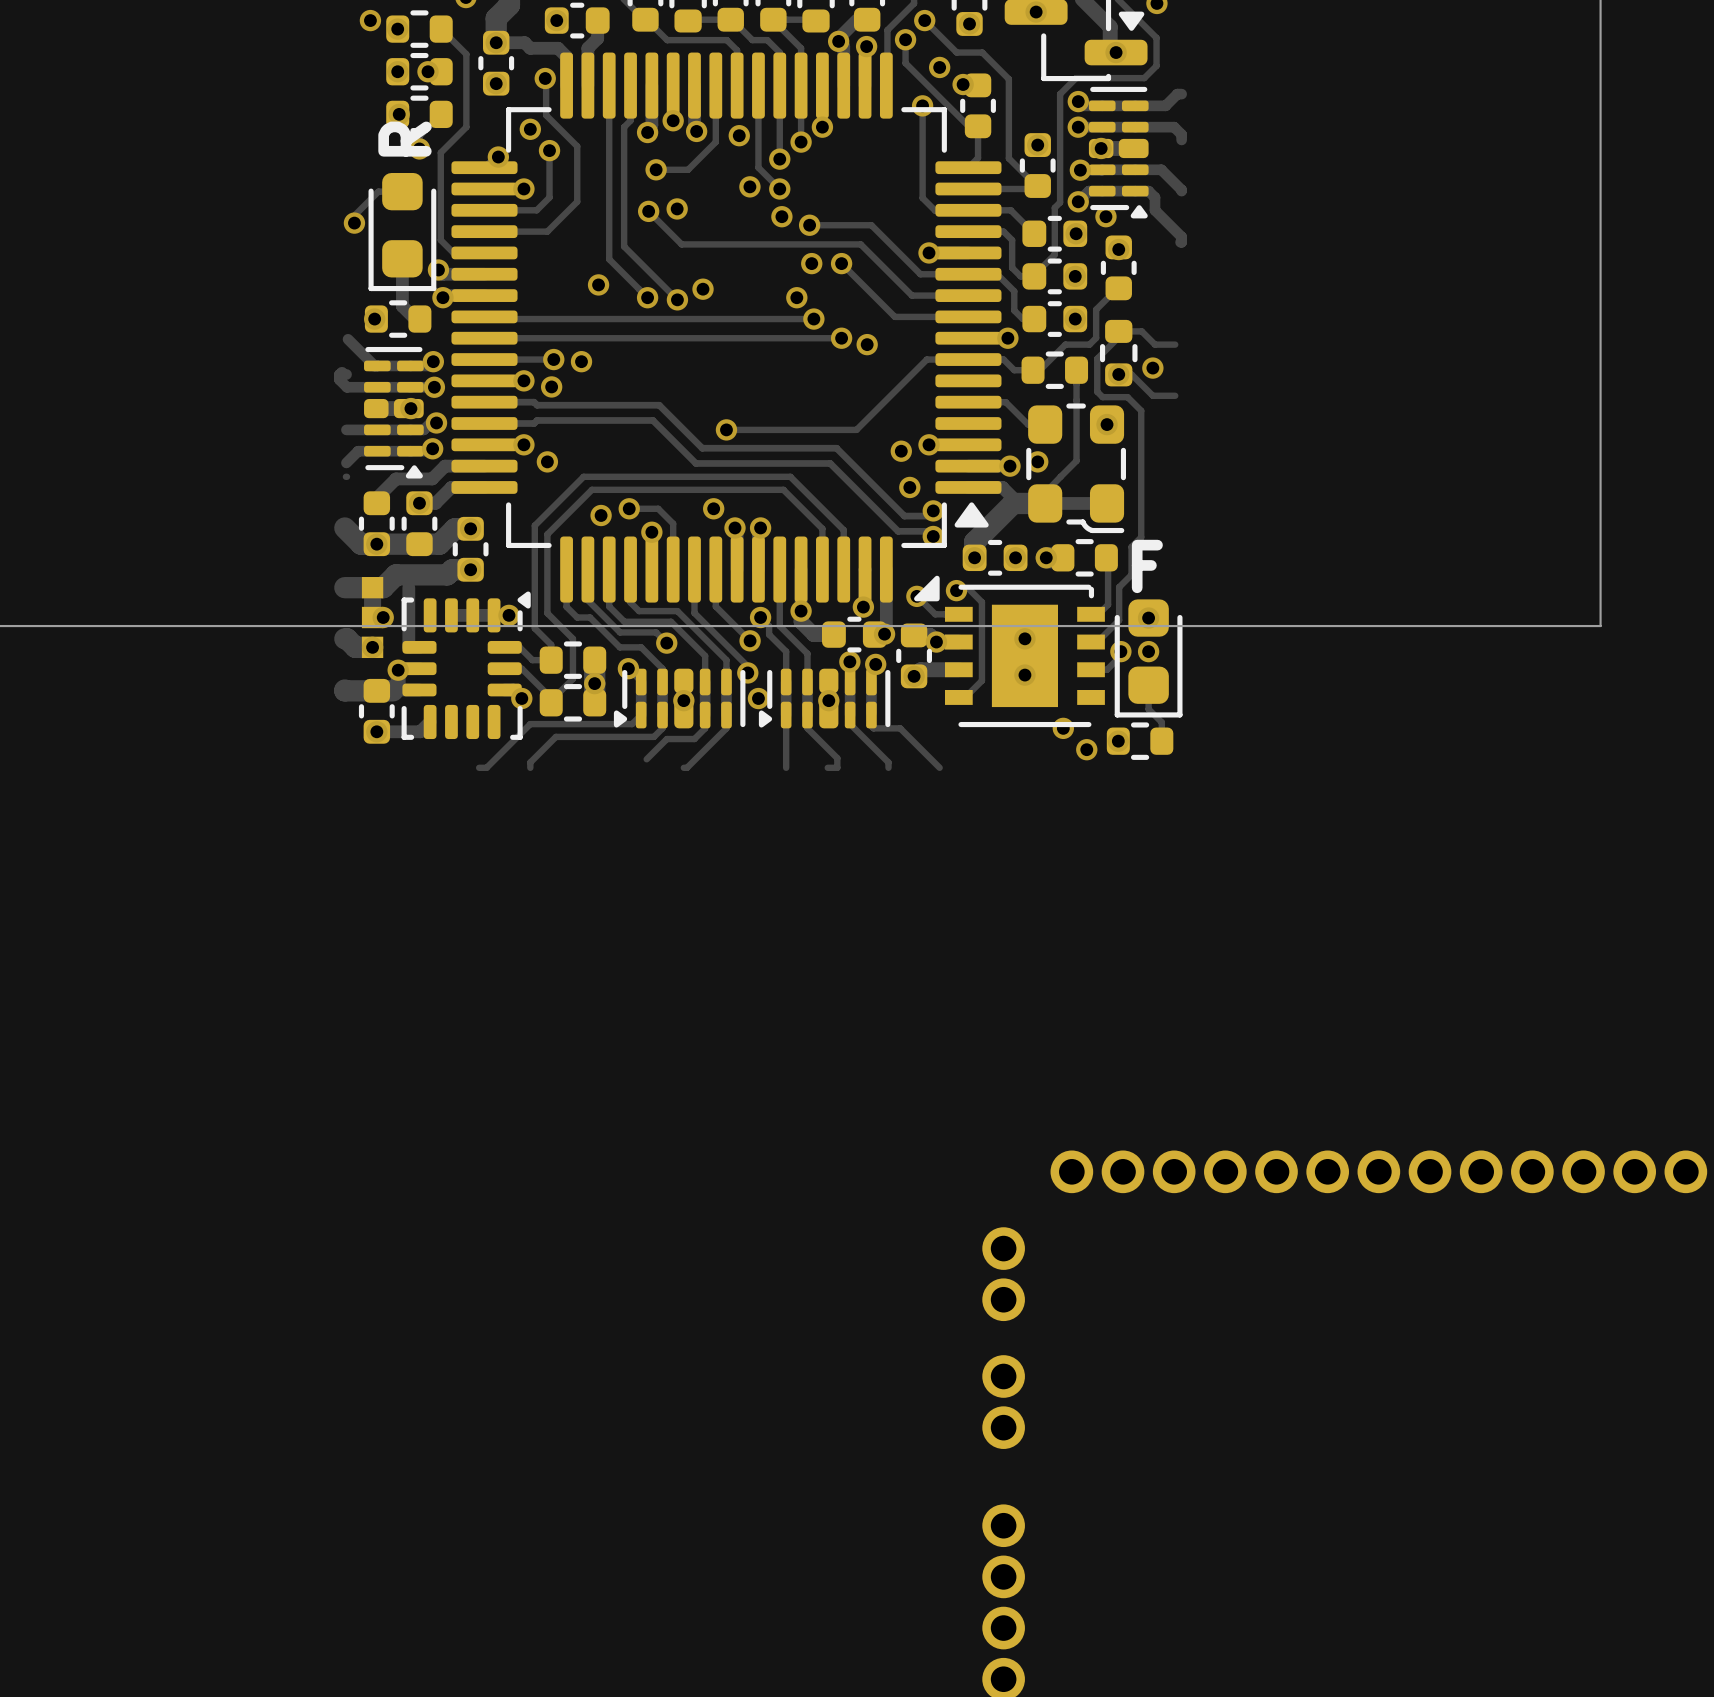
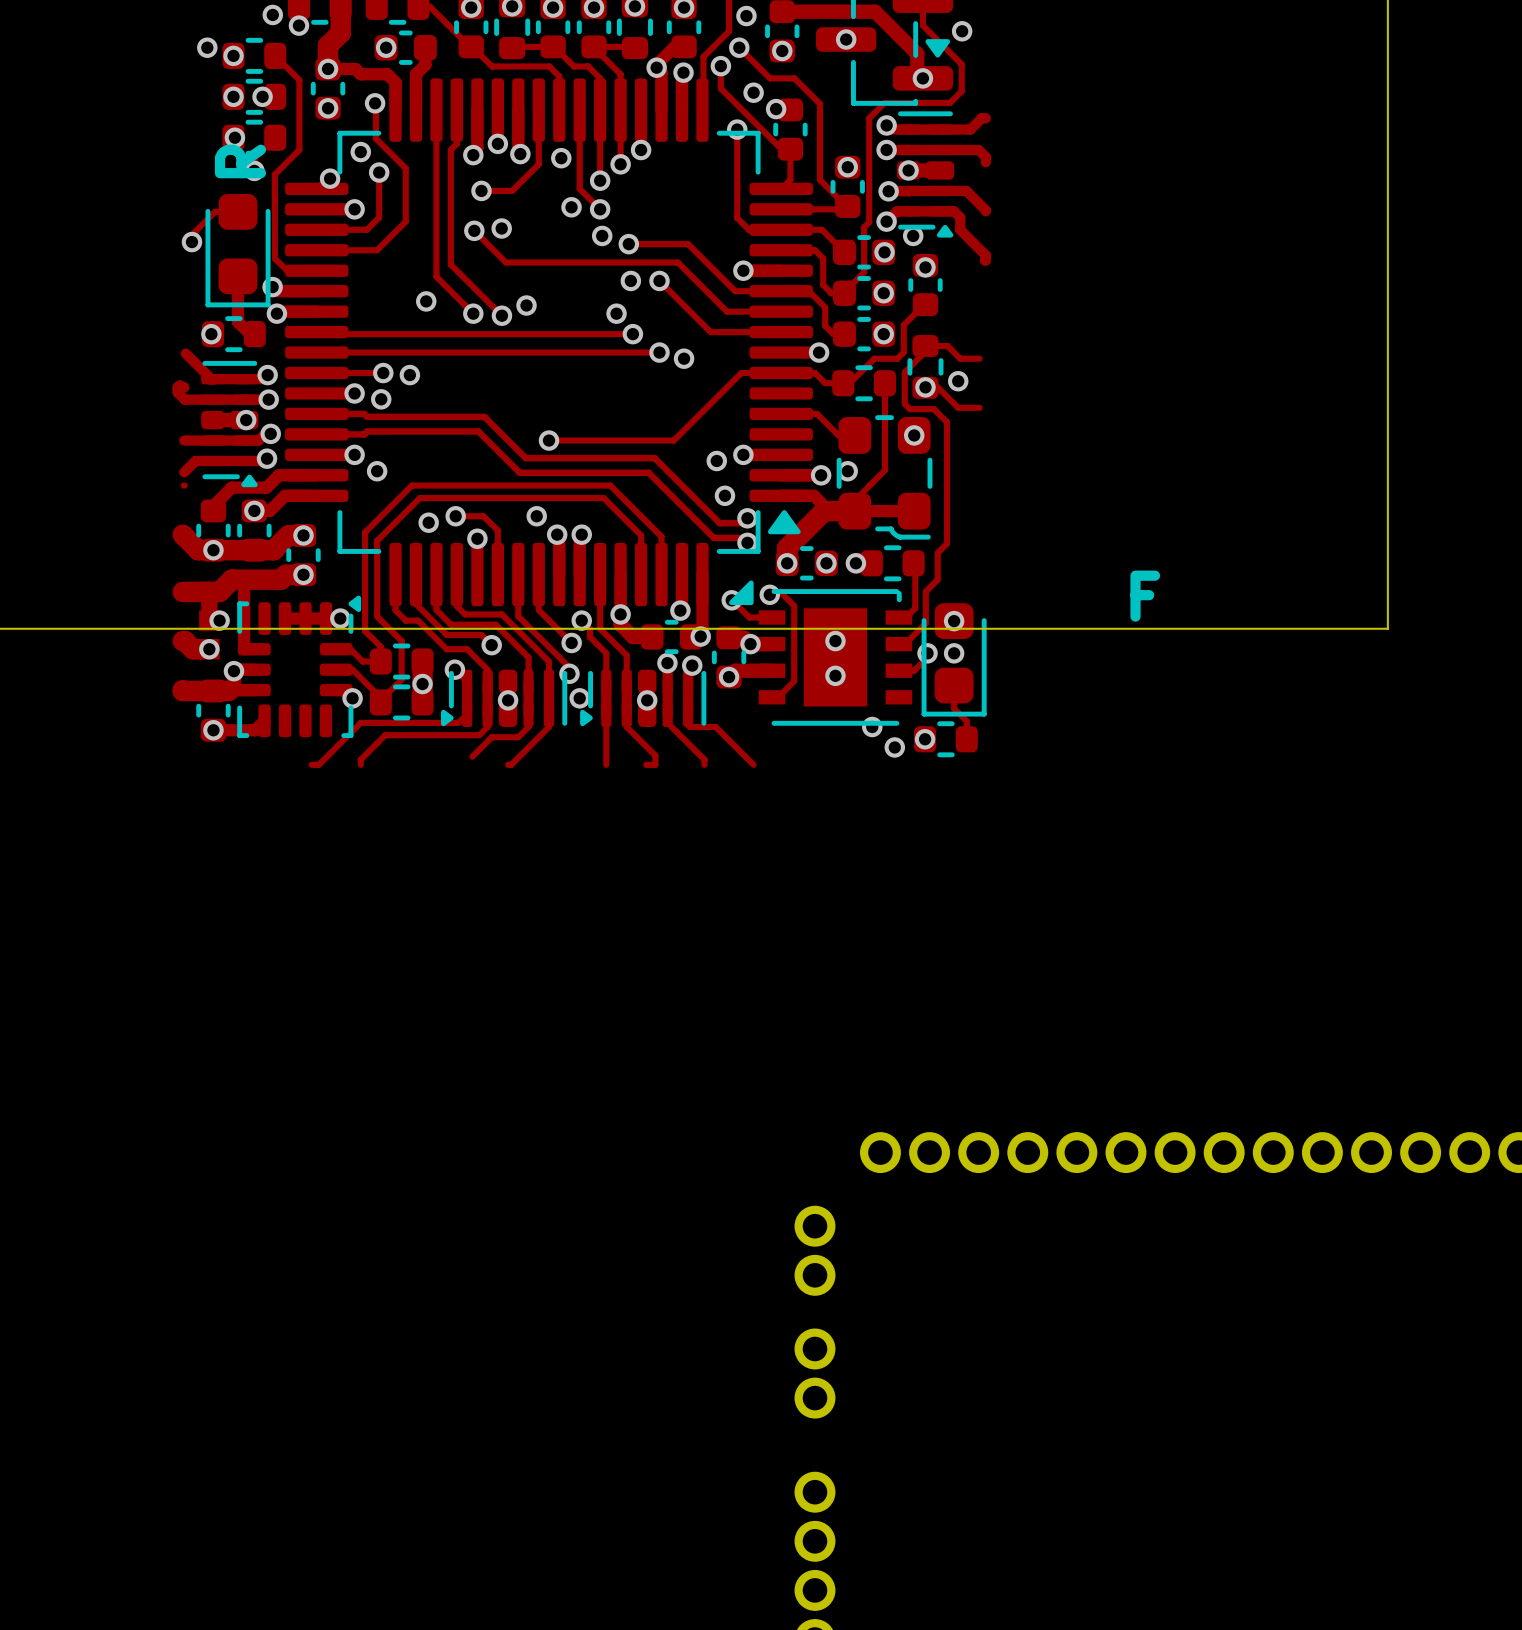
text position: F (1147, 566) -> F (1145, 596)

